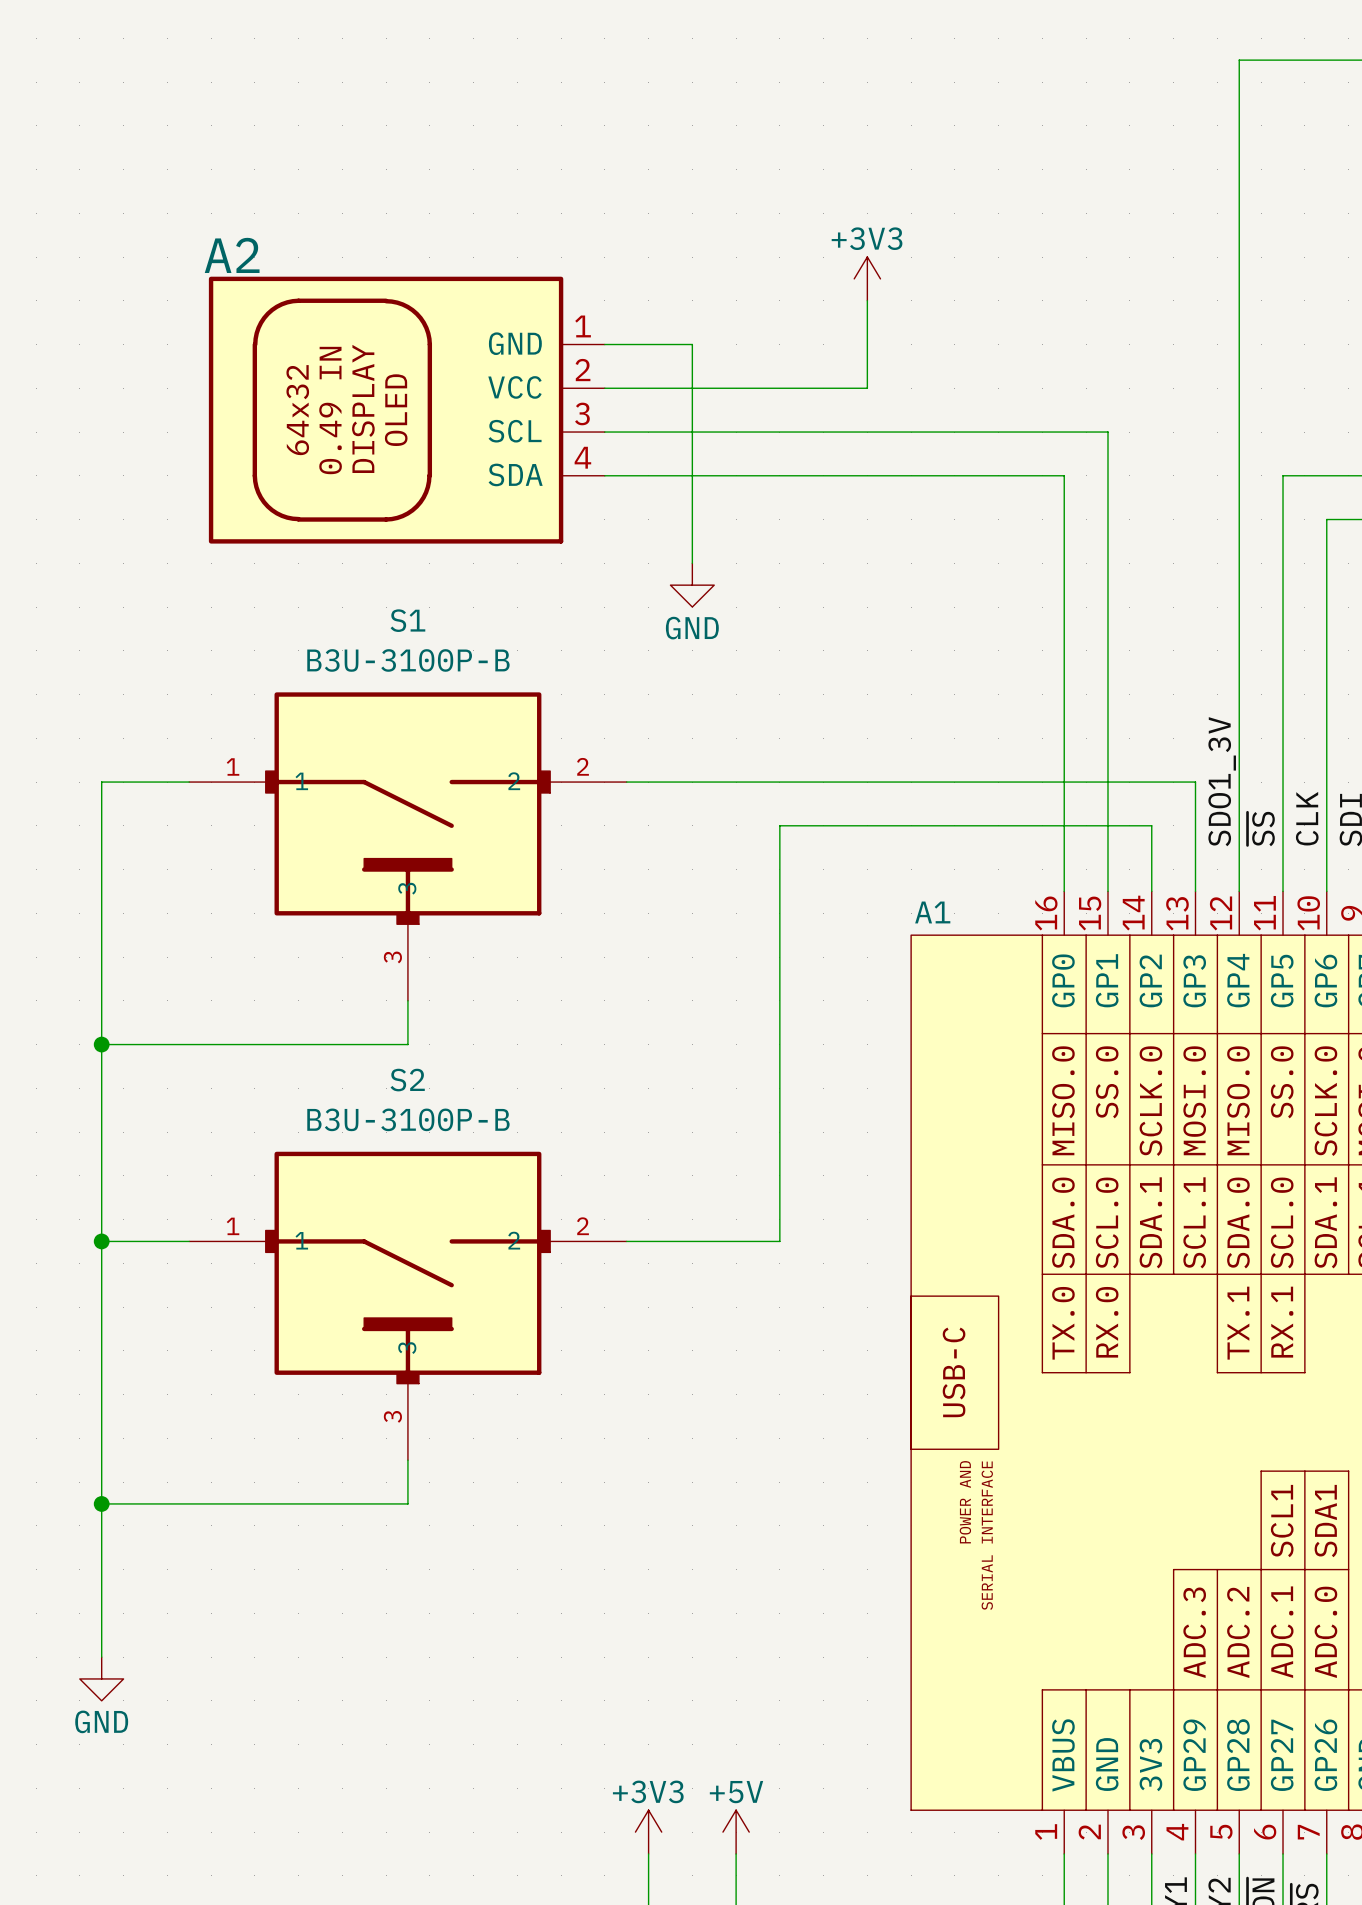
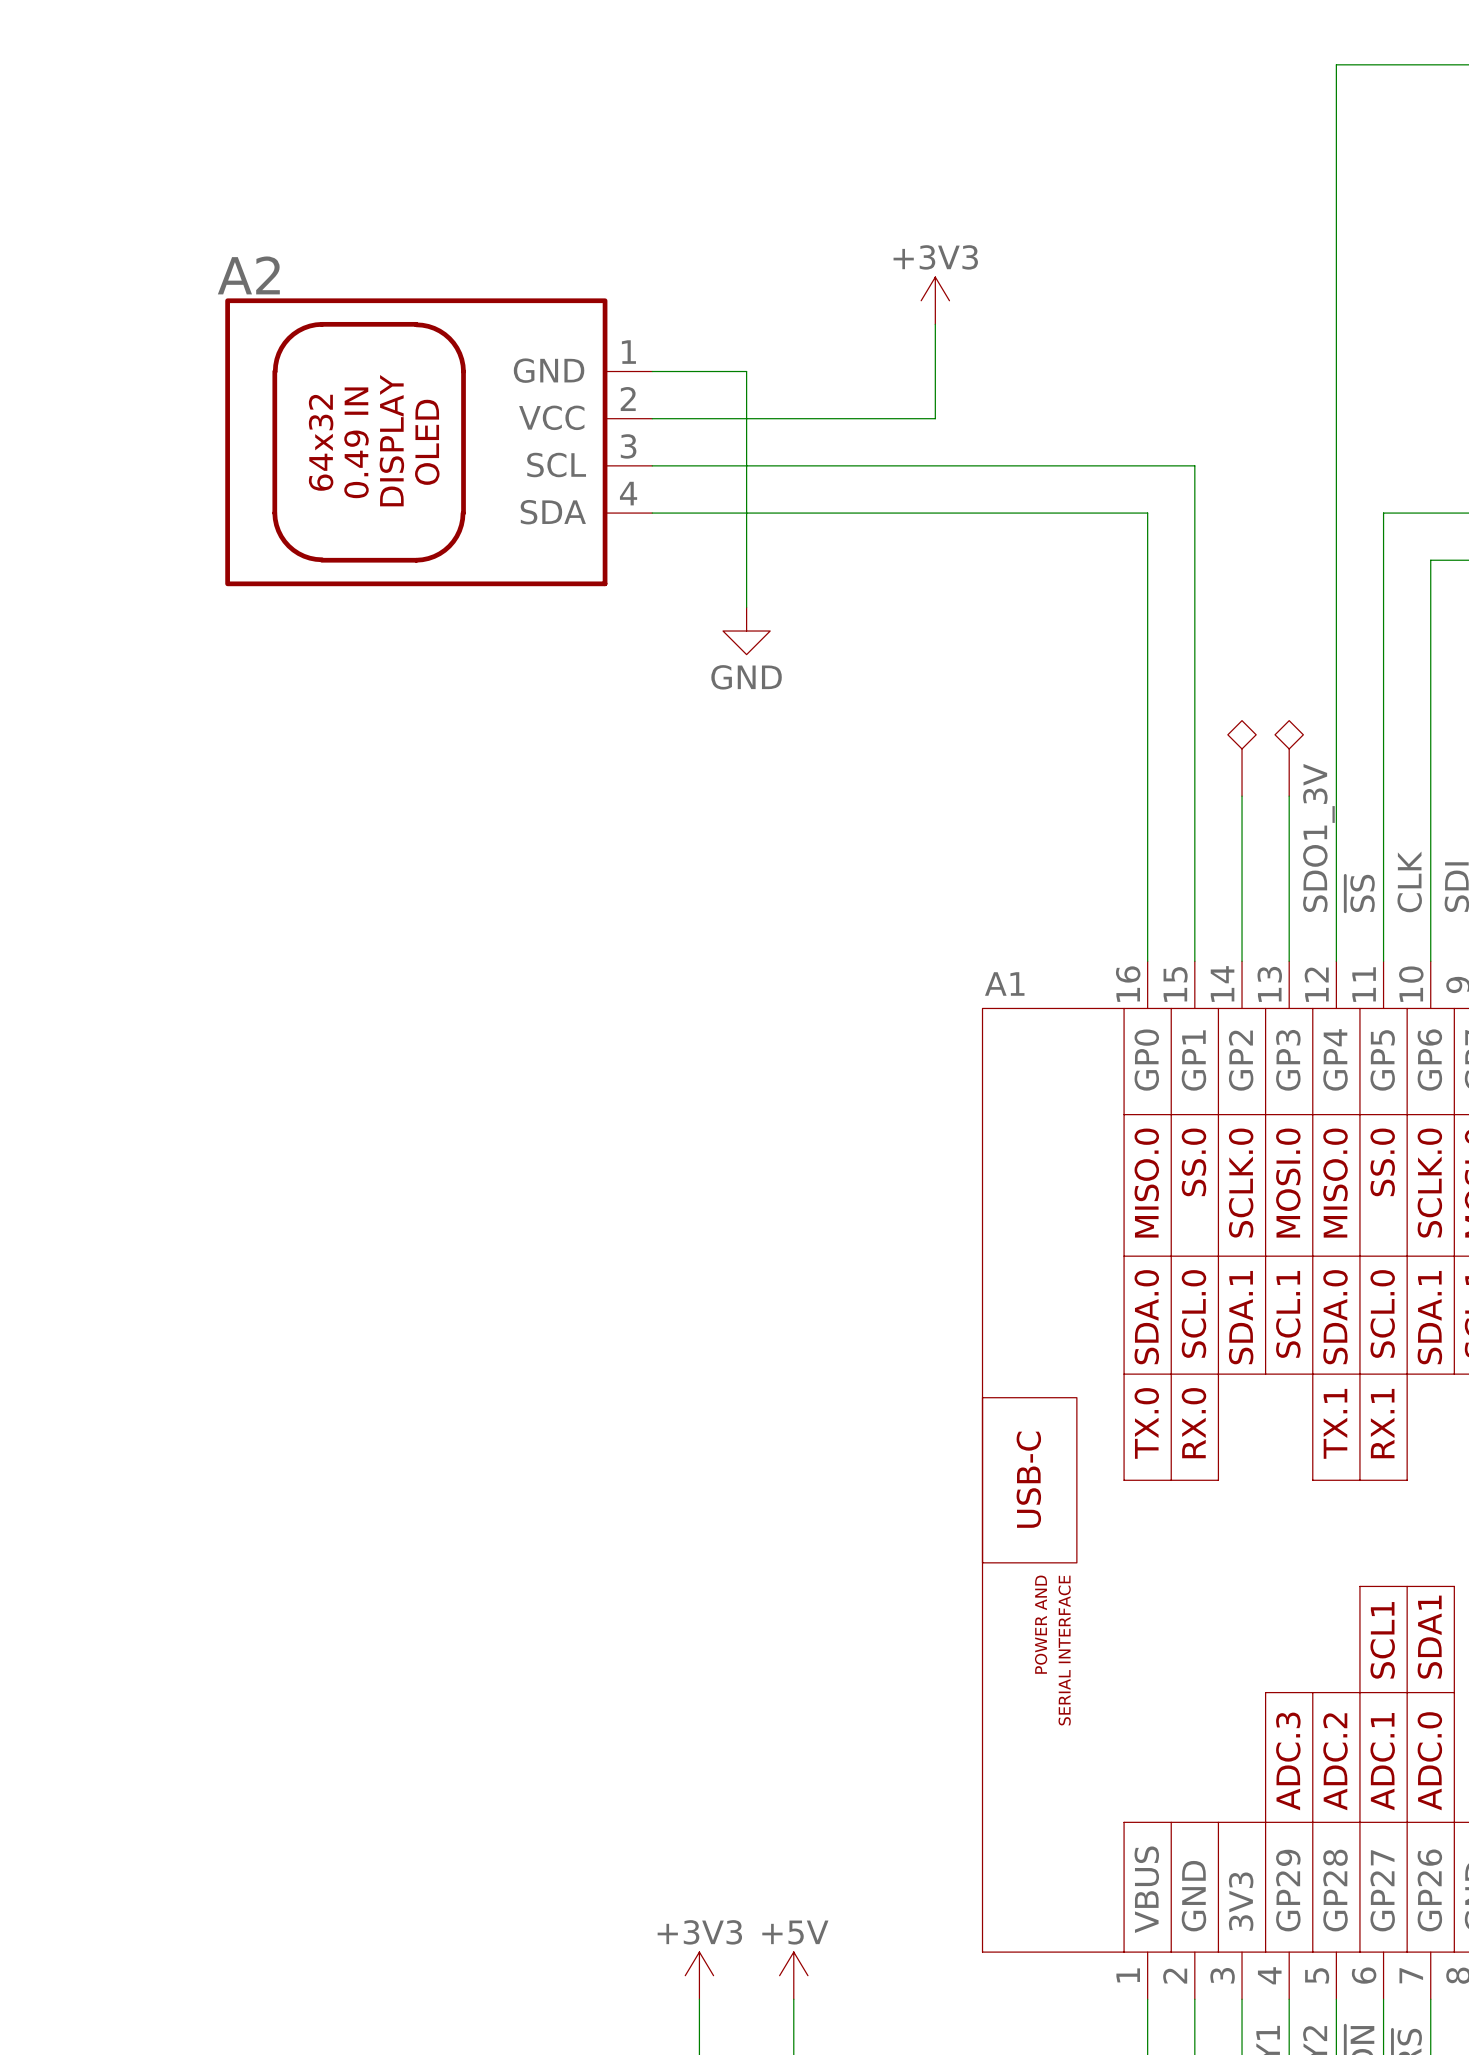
part: none -> (1242, 758)
part: none -> (1289, 758)
wire: (189, 782) (101, 782) (101, 1657) -> none
wire: (626, 782) (1195, 782) -> (1289, 796) (1289, 843)
wire: (1151, 825) (779, 825) (779, 1241) (626, 1241) -> (1242, 890) (1242, 796)
S1: B3U-3100P-B (407, 846) -> none
wire: (407, 1000) (407, 1044) (101, 1044) -> none
junction: (101, 1044) -> none
wire: (101, 1241) (189, 1241) -> none
junction: (101, 1241) -> none
S2: B3U-3100P-B (407, 1305) -> none
wire: (407, 1460) (407, 1503) (101, 1503) -> none
junction: (101, 1503) -> none
power symbol: GND (101, 1678) -> none

